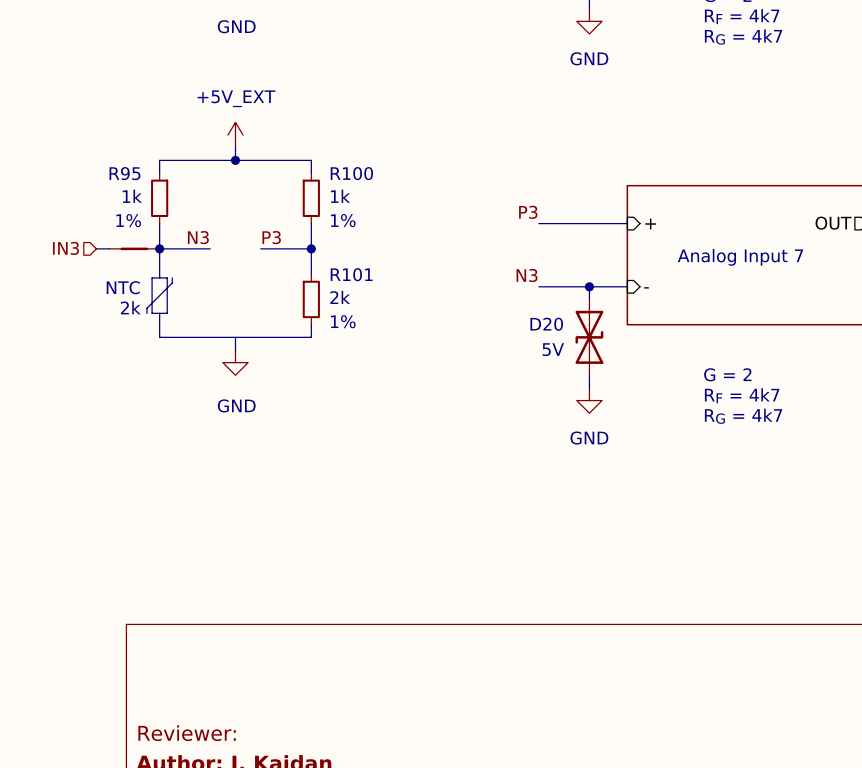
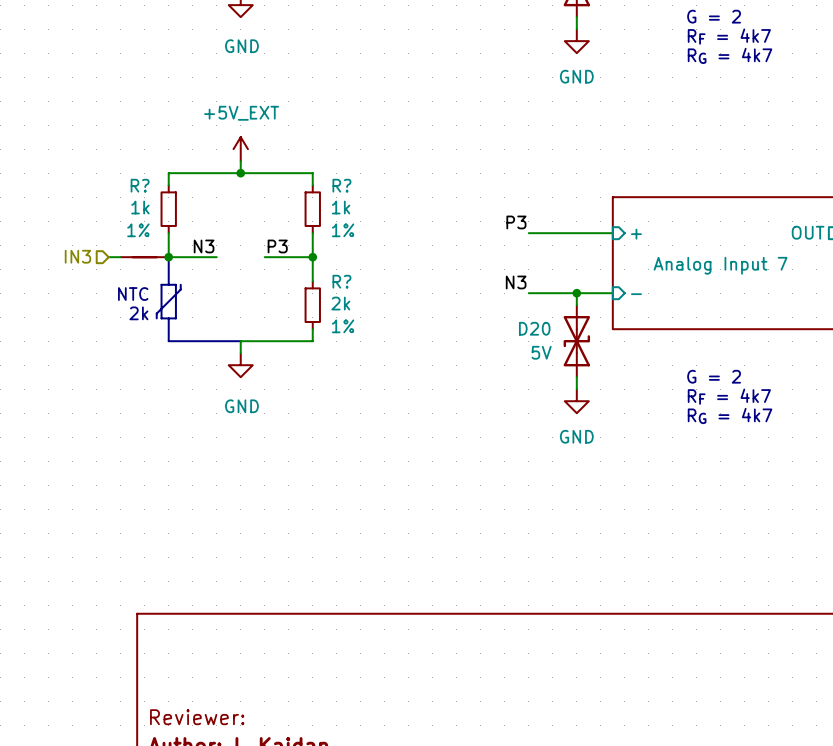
R95 name: R95 (124, 173) -> R? (140, 185)
R100 name: R100 (351, 173) -> R? (341, 185)
R101 name: R101 (351, 274) -> R? (341, 281)

